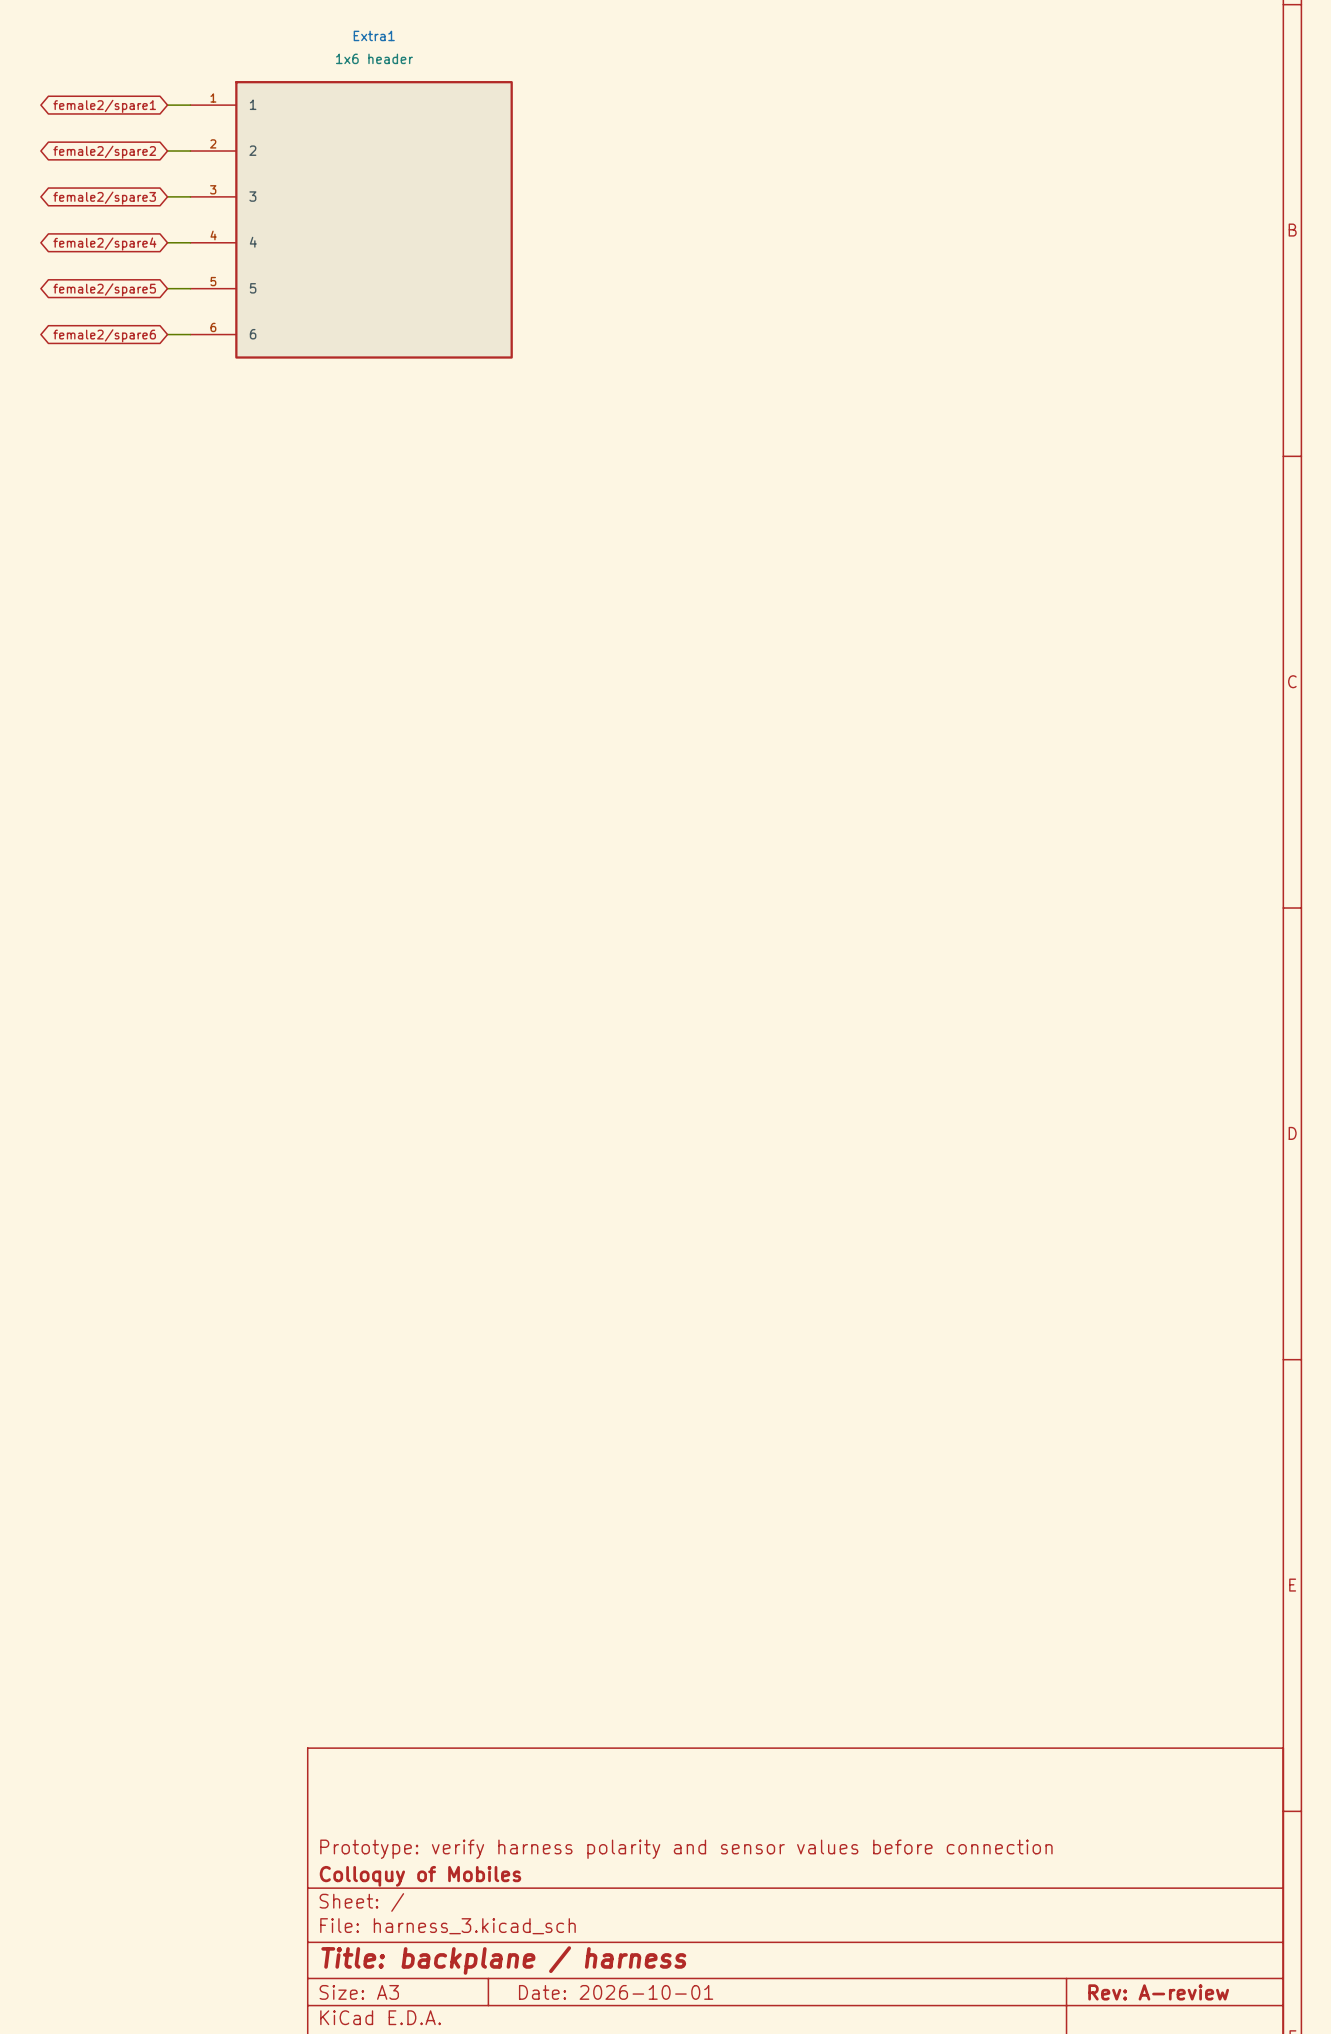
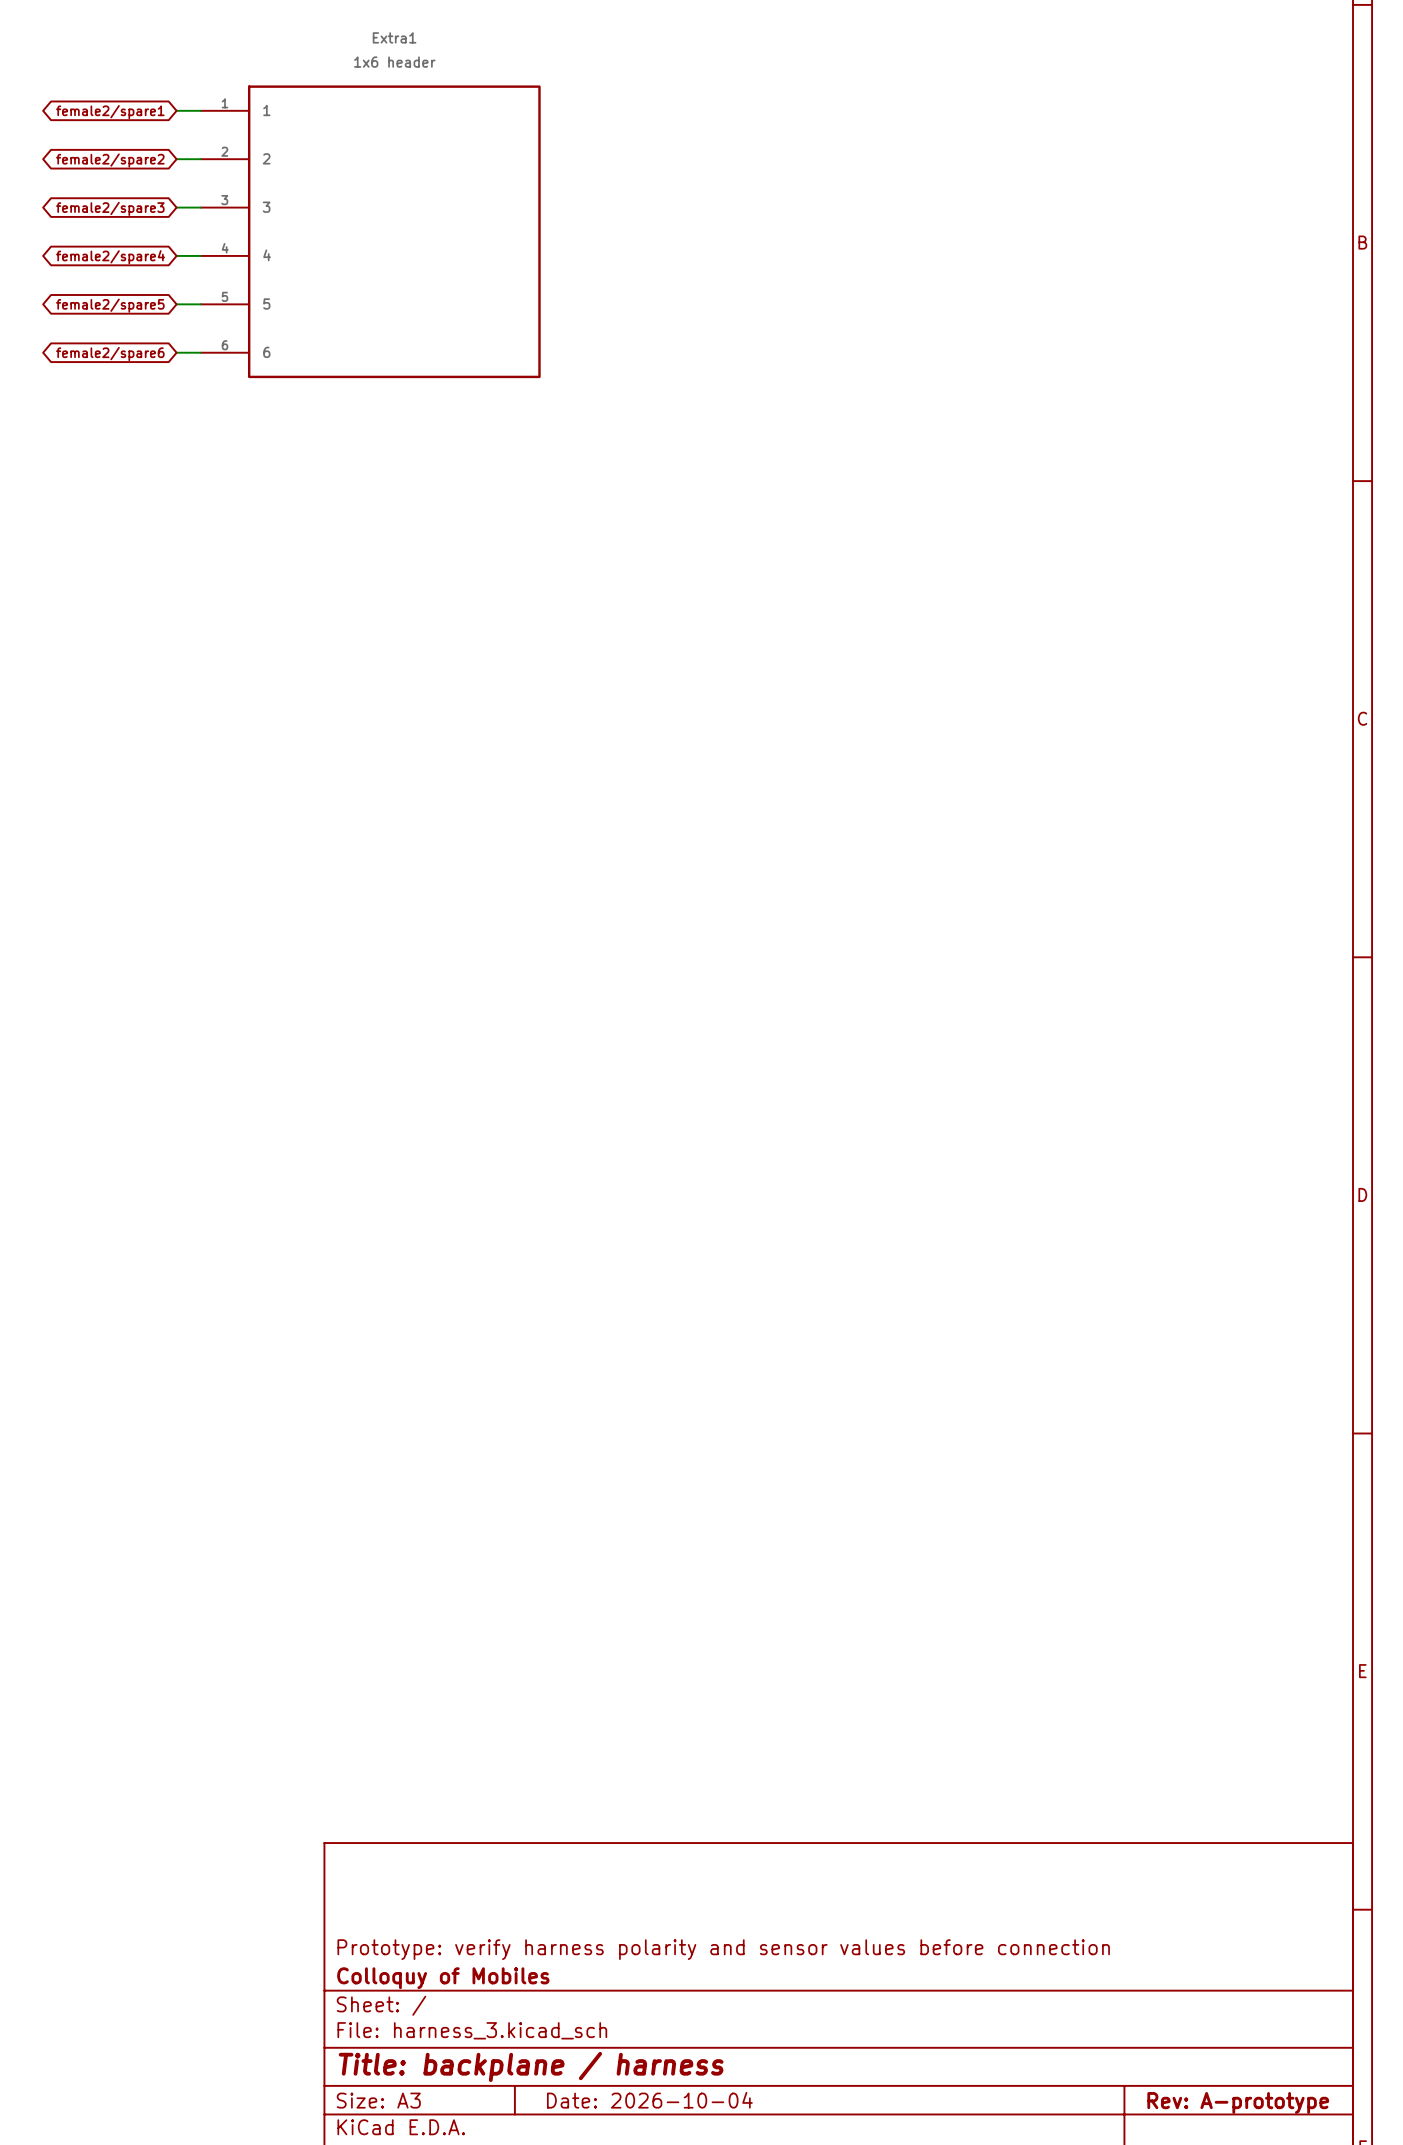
title block: Date: 2026-10-01 (616, 1992) -> Date: 2026-10-04 (649, 2100)
title block: Rev: A-review (1158, 1992) -> Rev: A-prototype (1238, 2102)

